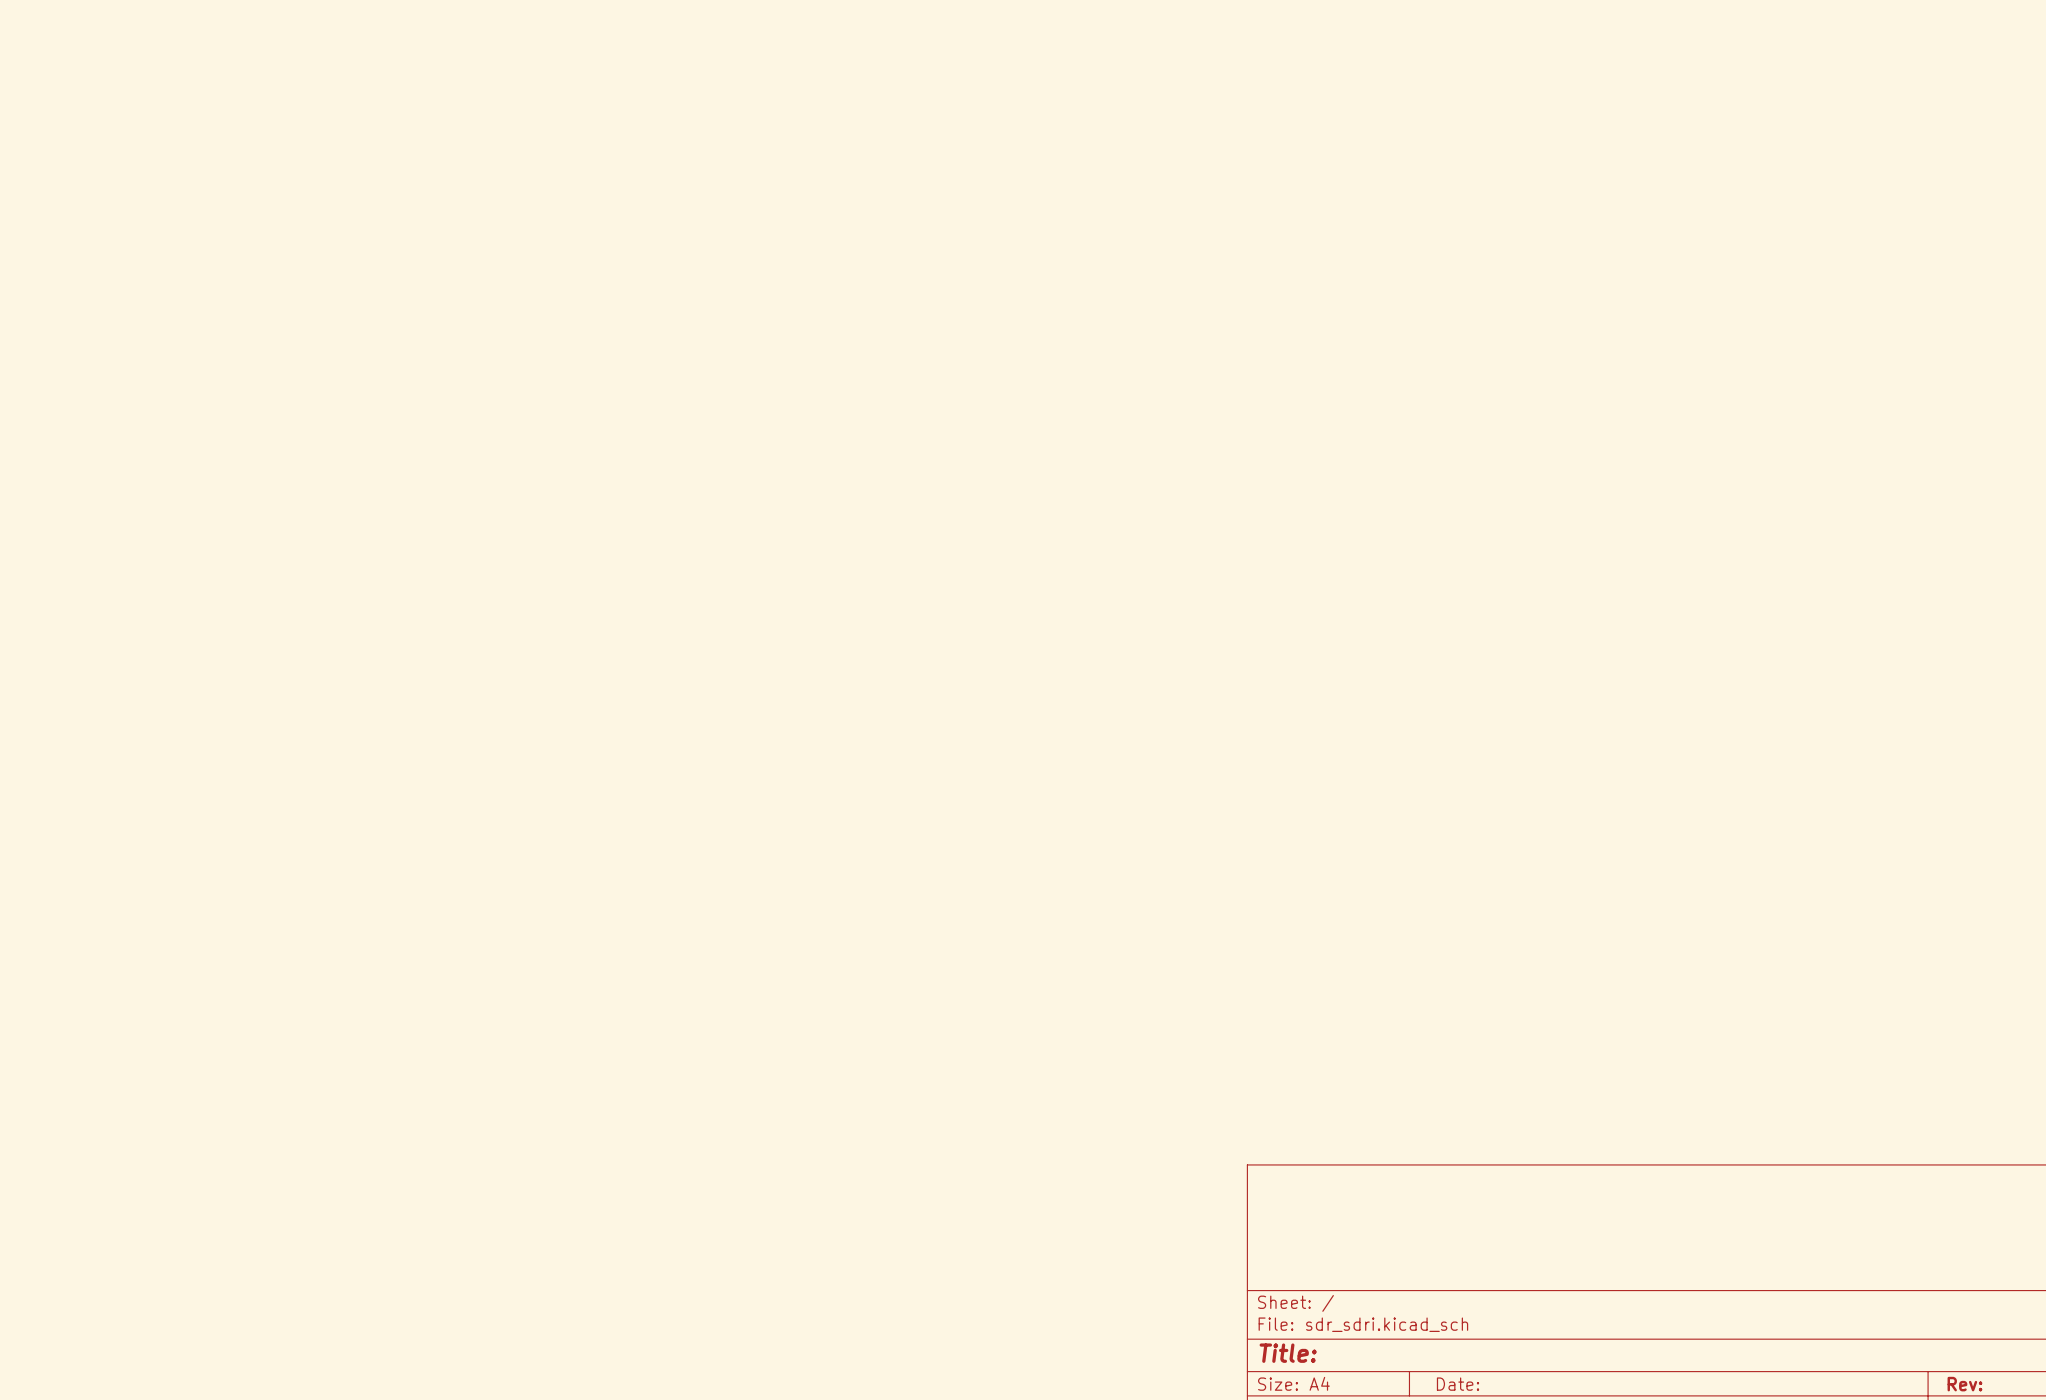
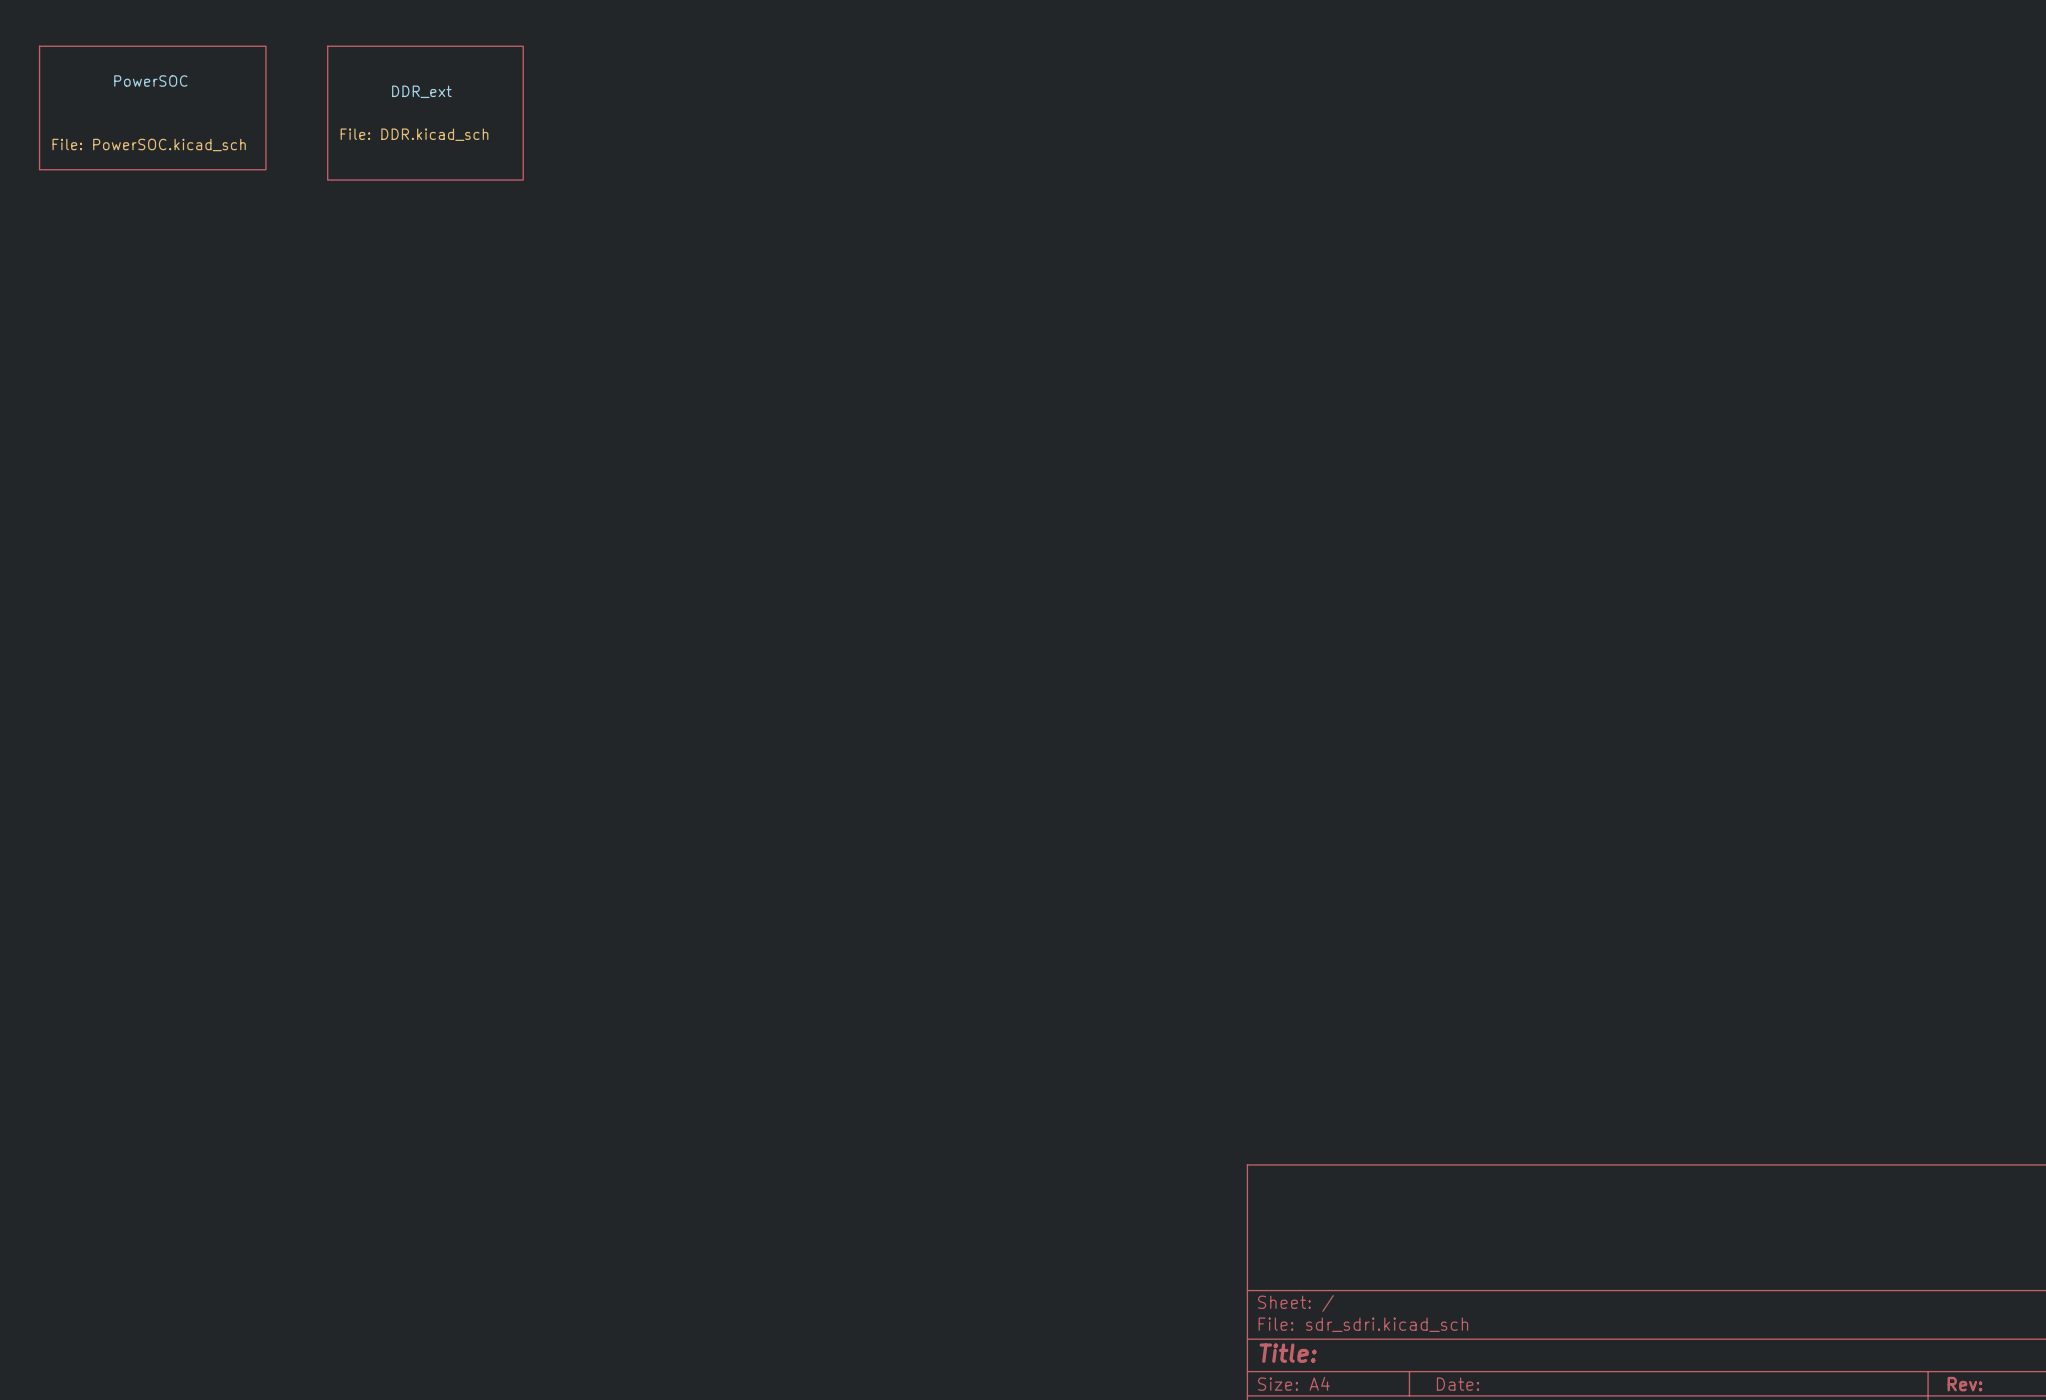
sheet PowerSOC: none -> File: PowerSOC.kicad_sch (152, 107)
sheet DDR_ext: none -> File: DDR.kicad_sch (425, 113)

